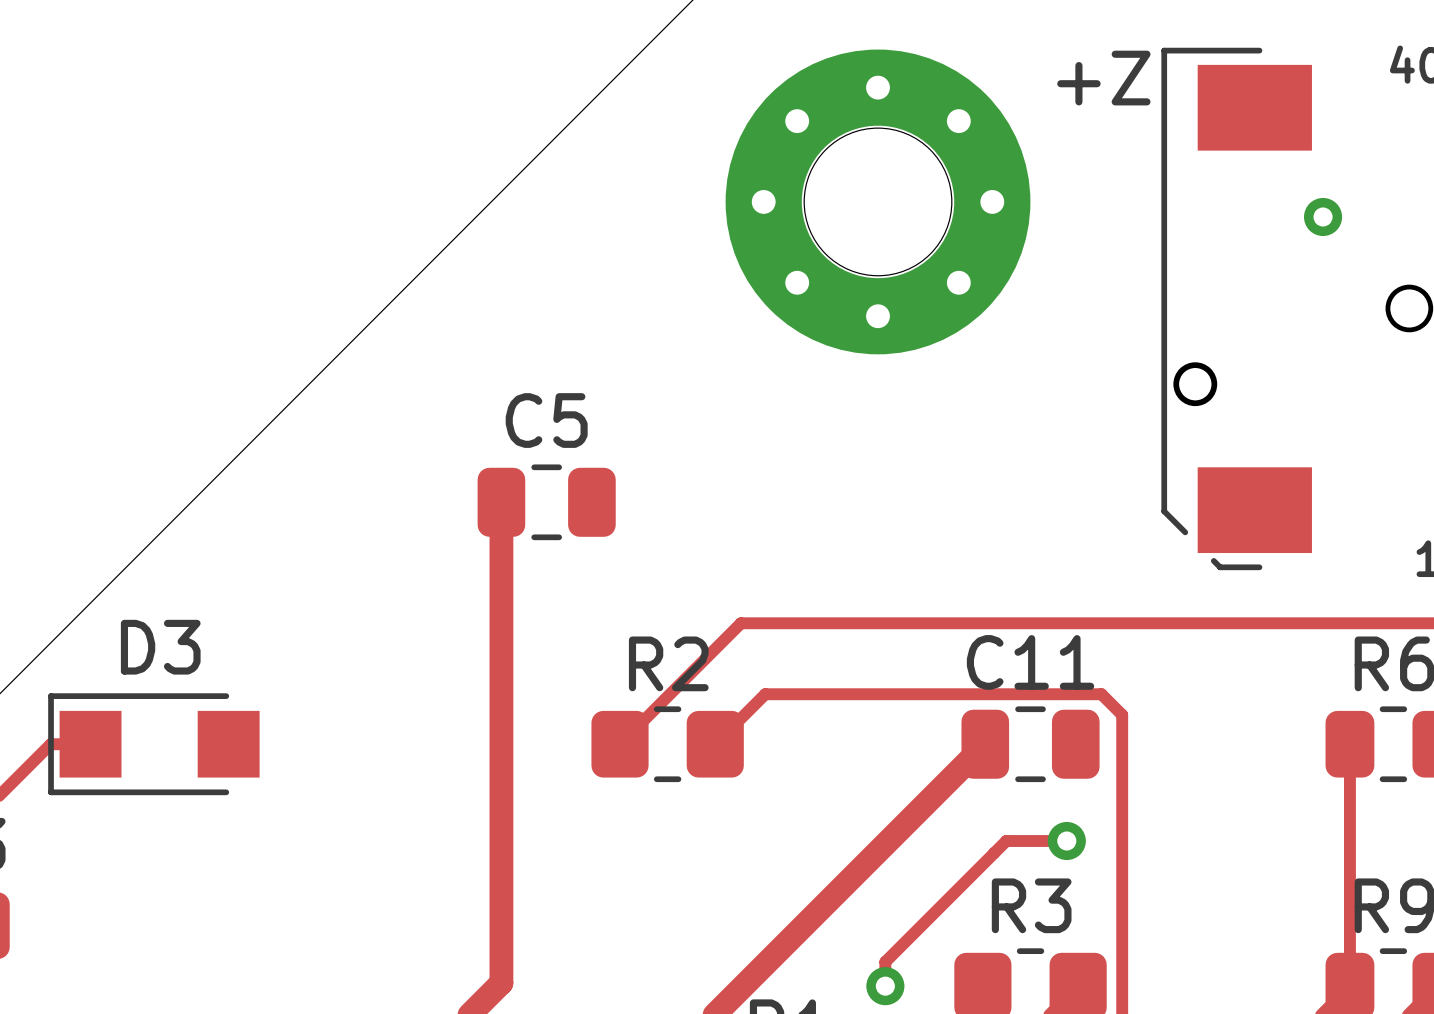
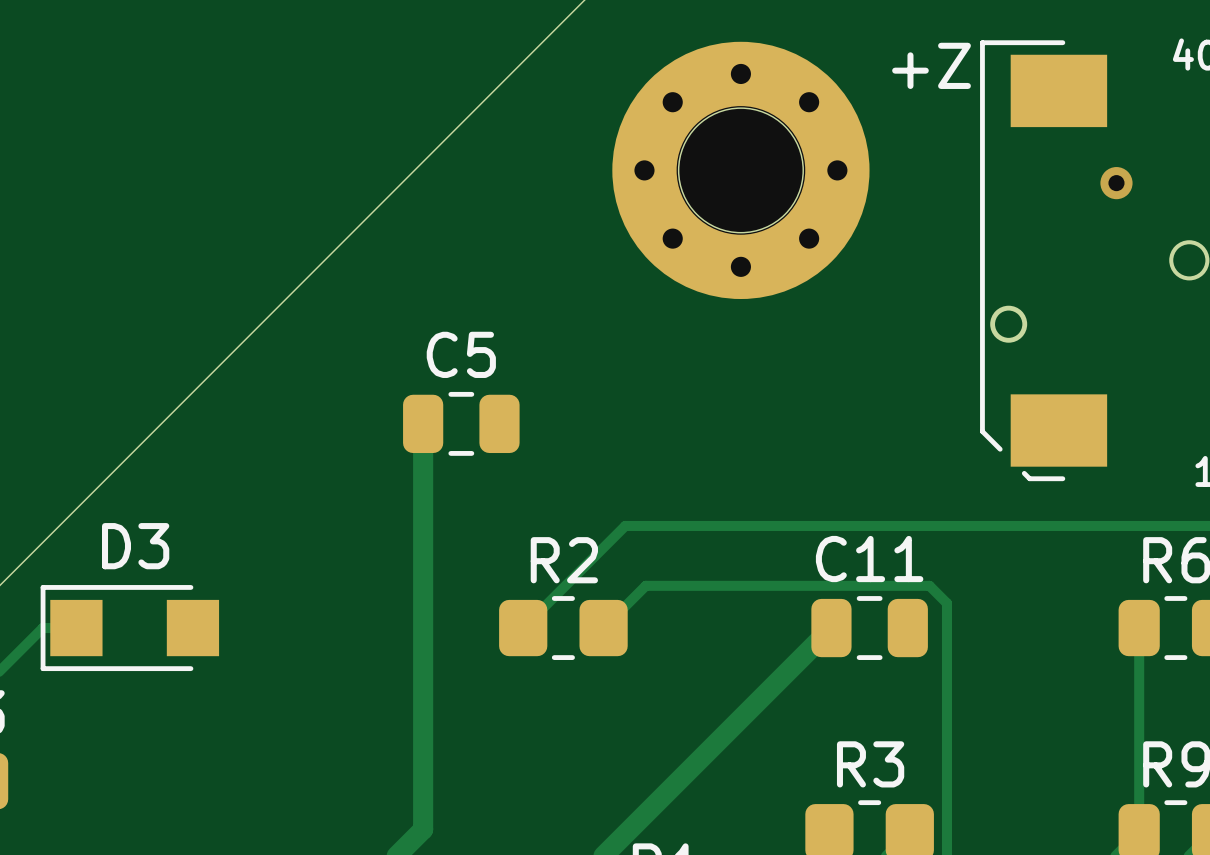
track: (1066, 841) (1006, 841) (885, 961) (885, 986) -> none
via: (1066, 841) -> none
via: (885, 986) -> none

